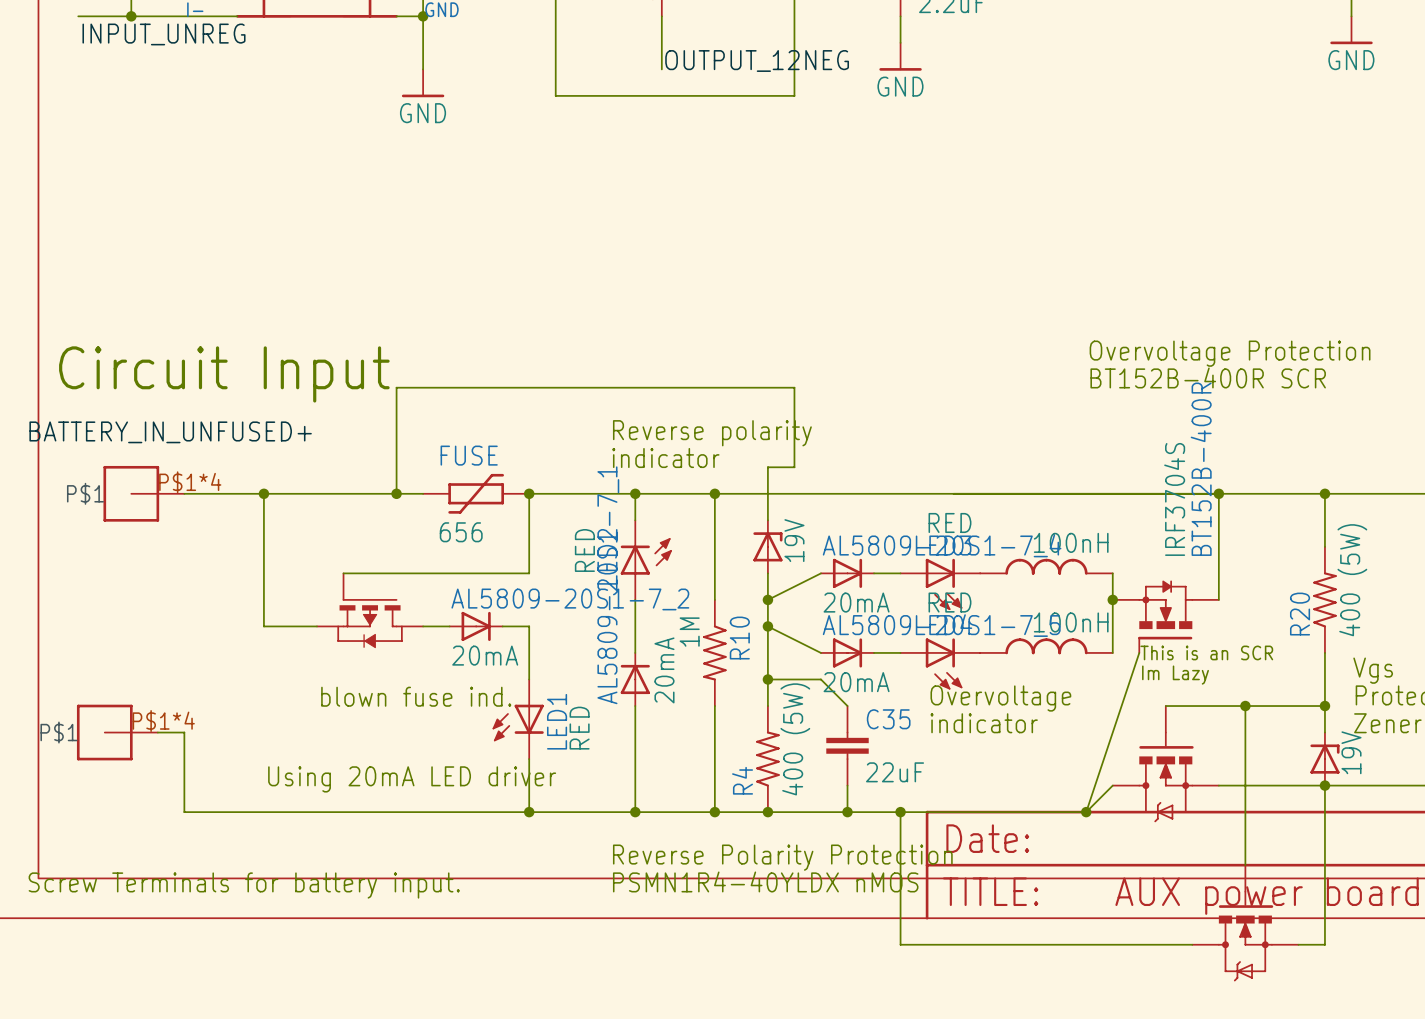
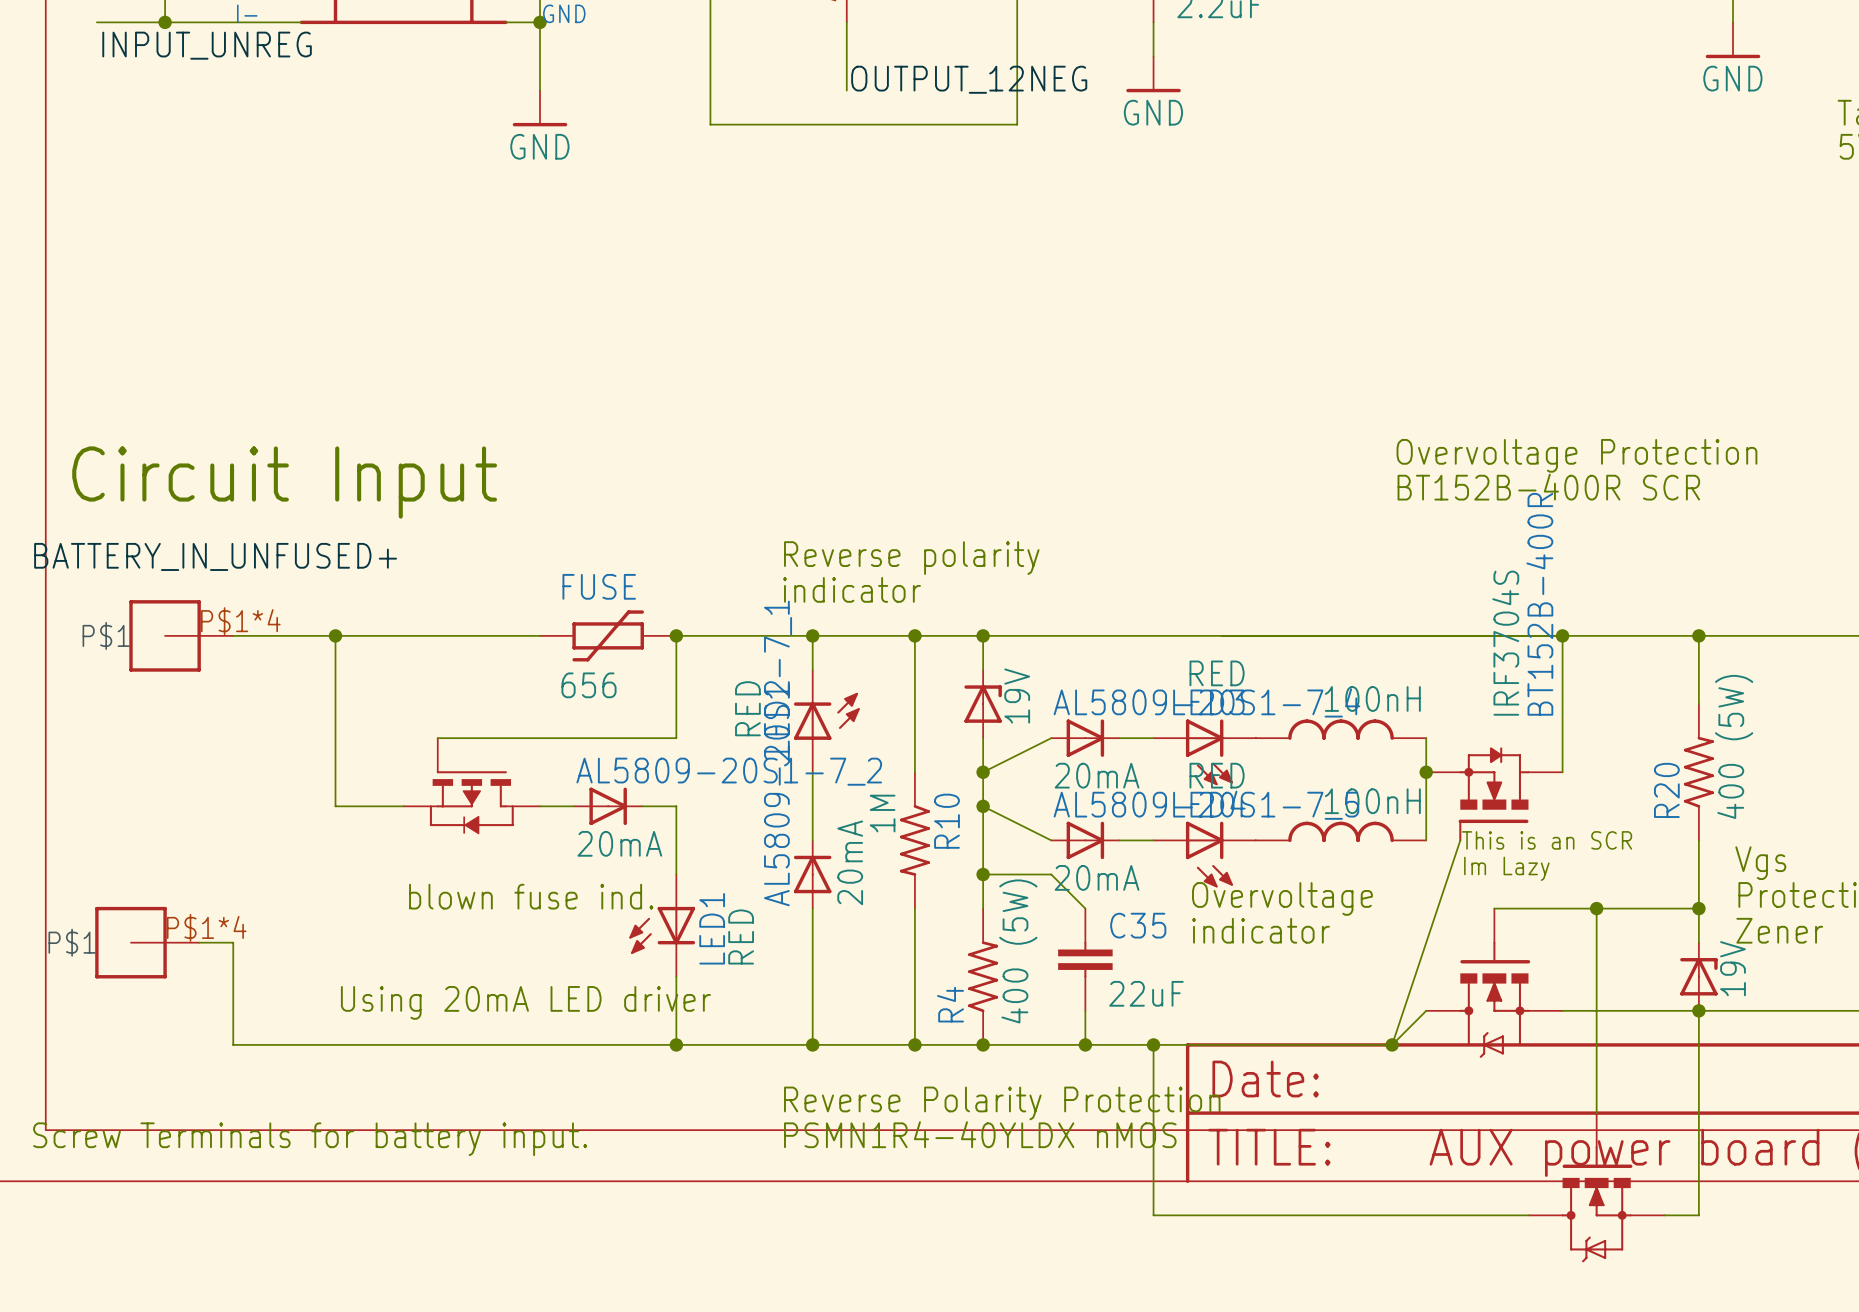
wire: (396, 493) (396, 387) (794, 387) (794, 467) (767, 467) (767, 493) -> none
junction: (396, 493) -> none
junction: none -> (983, 635)

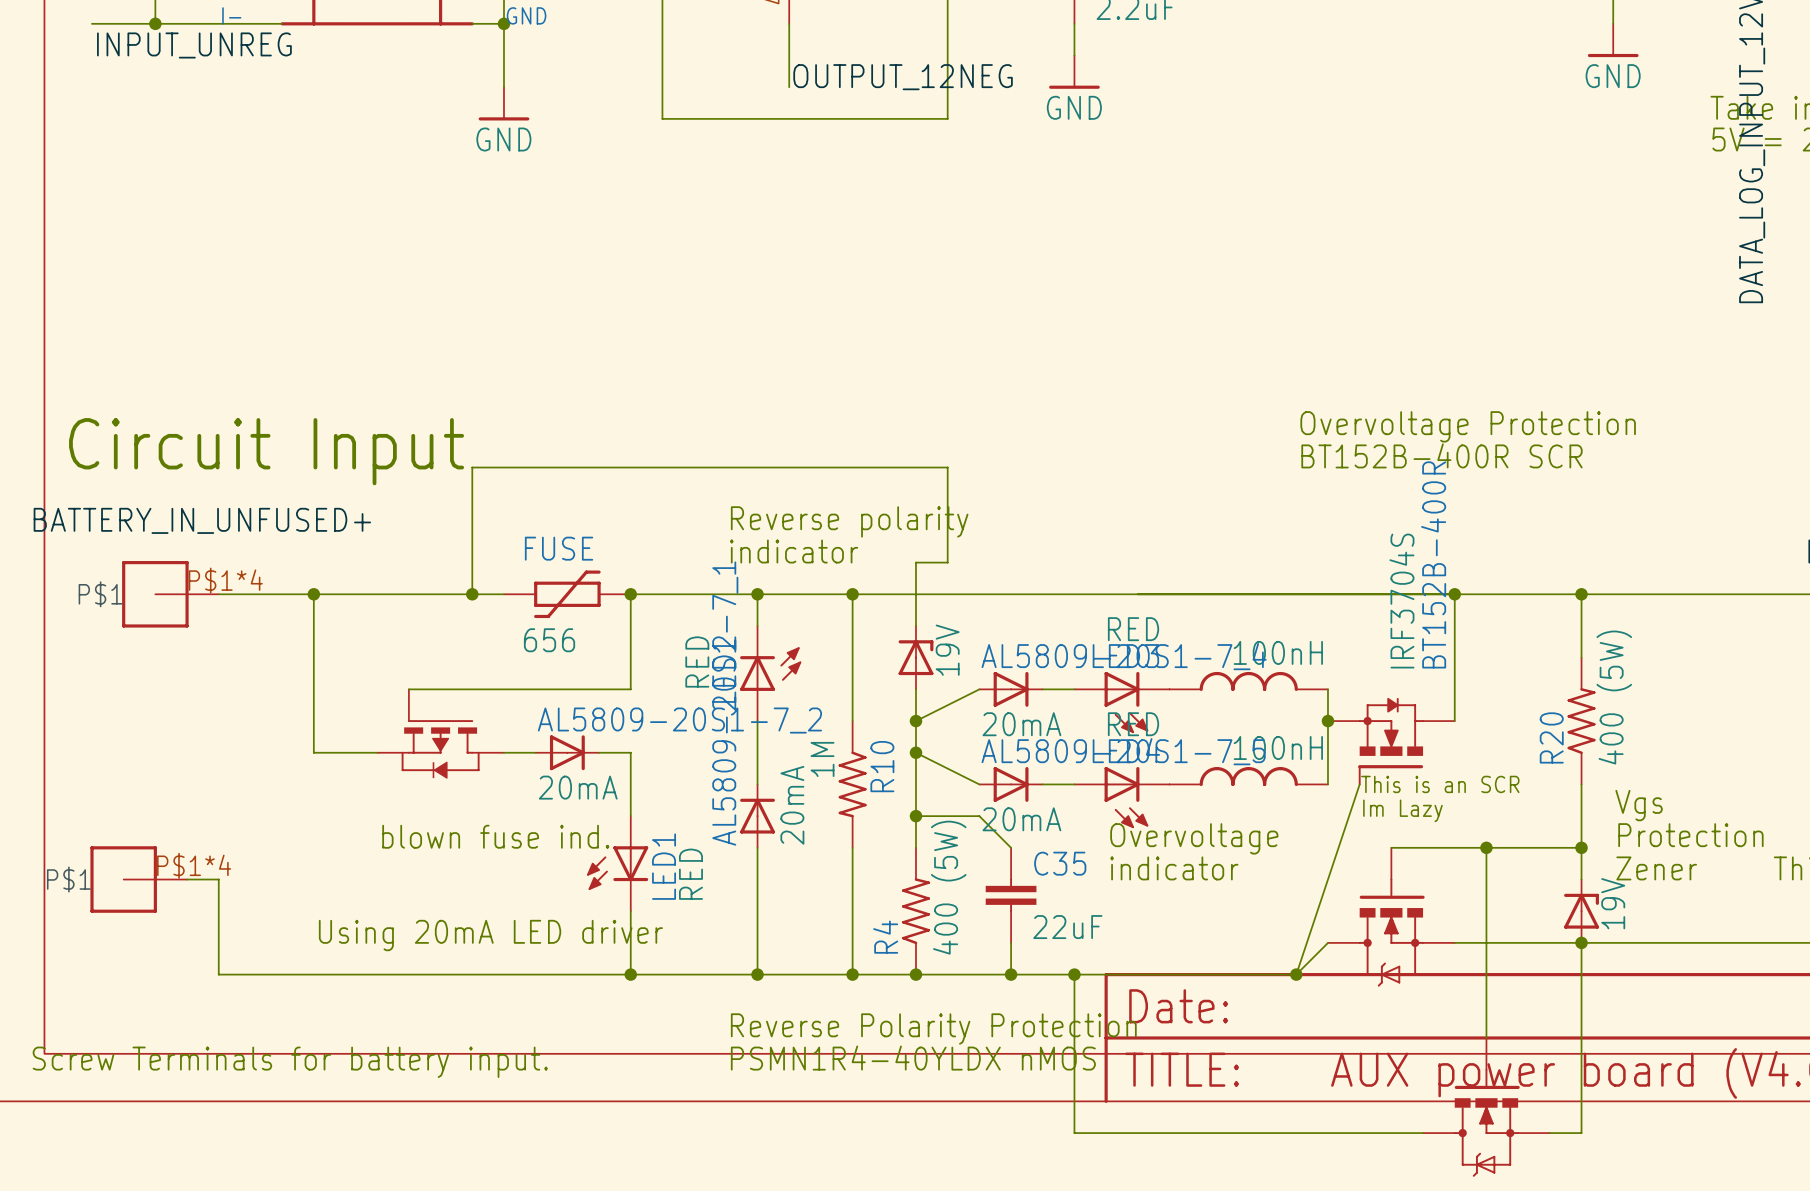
wire: none -> (472, 594) (472, 467) (947, 467) (947, 562) (915, 562) (915, 594)
junction: none -> (472, 594)
junction: (983, 635) -> none

